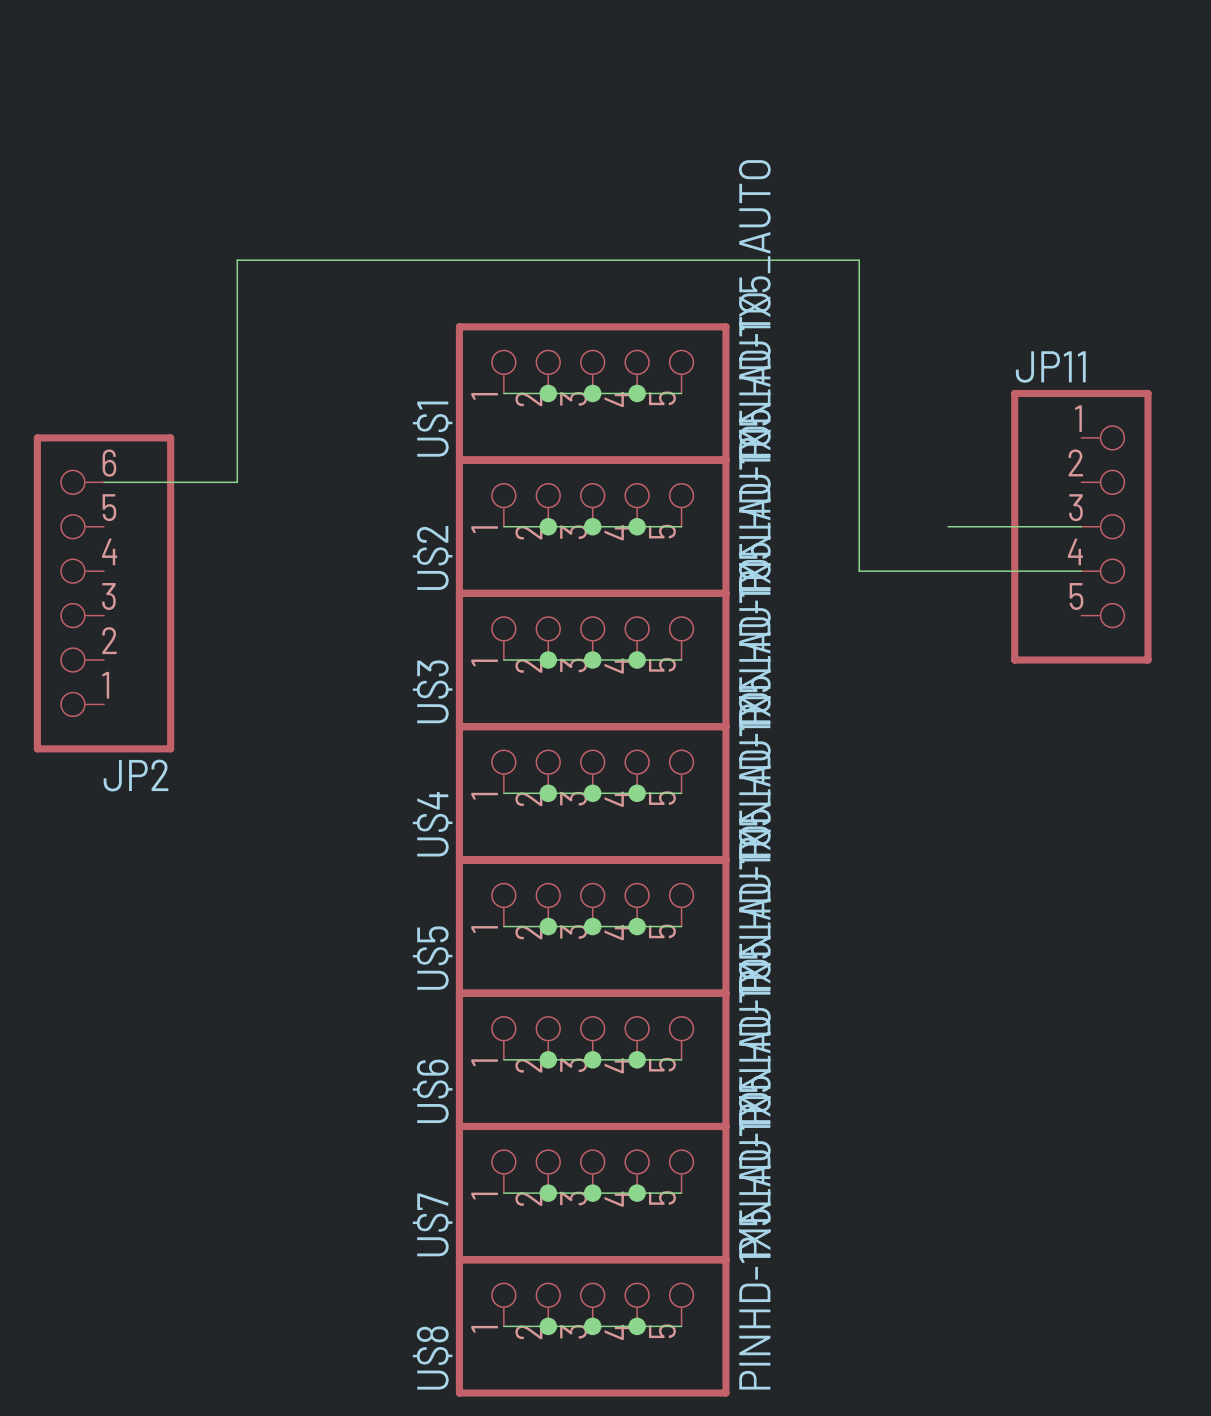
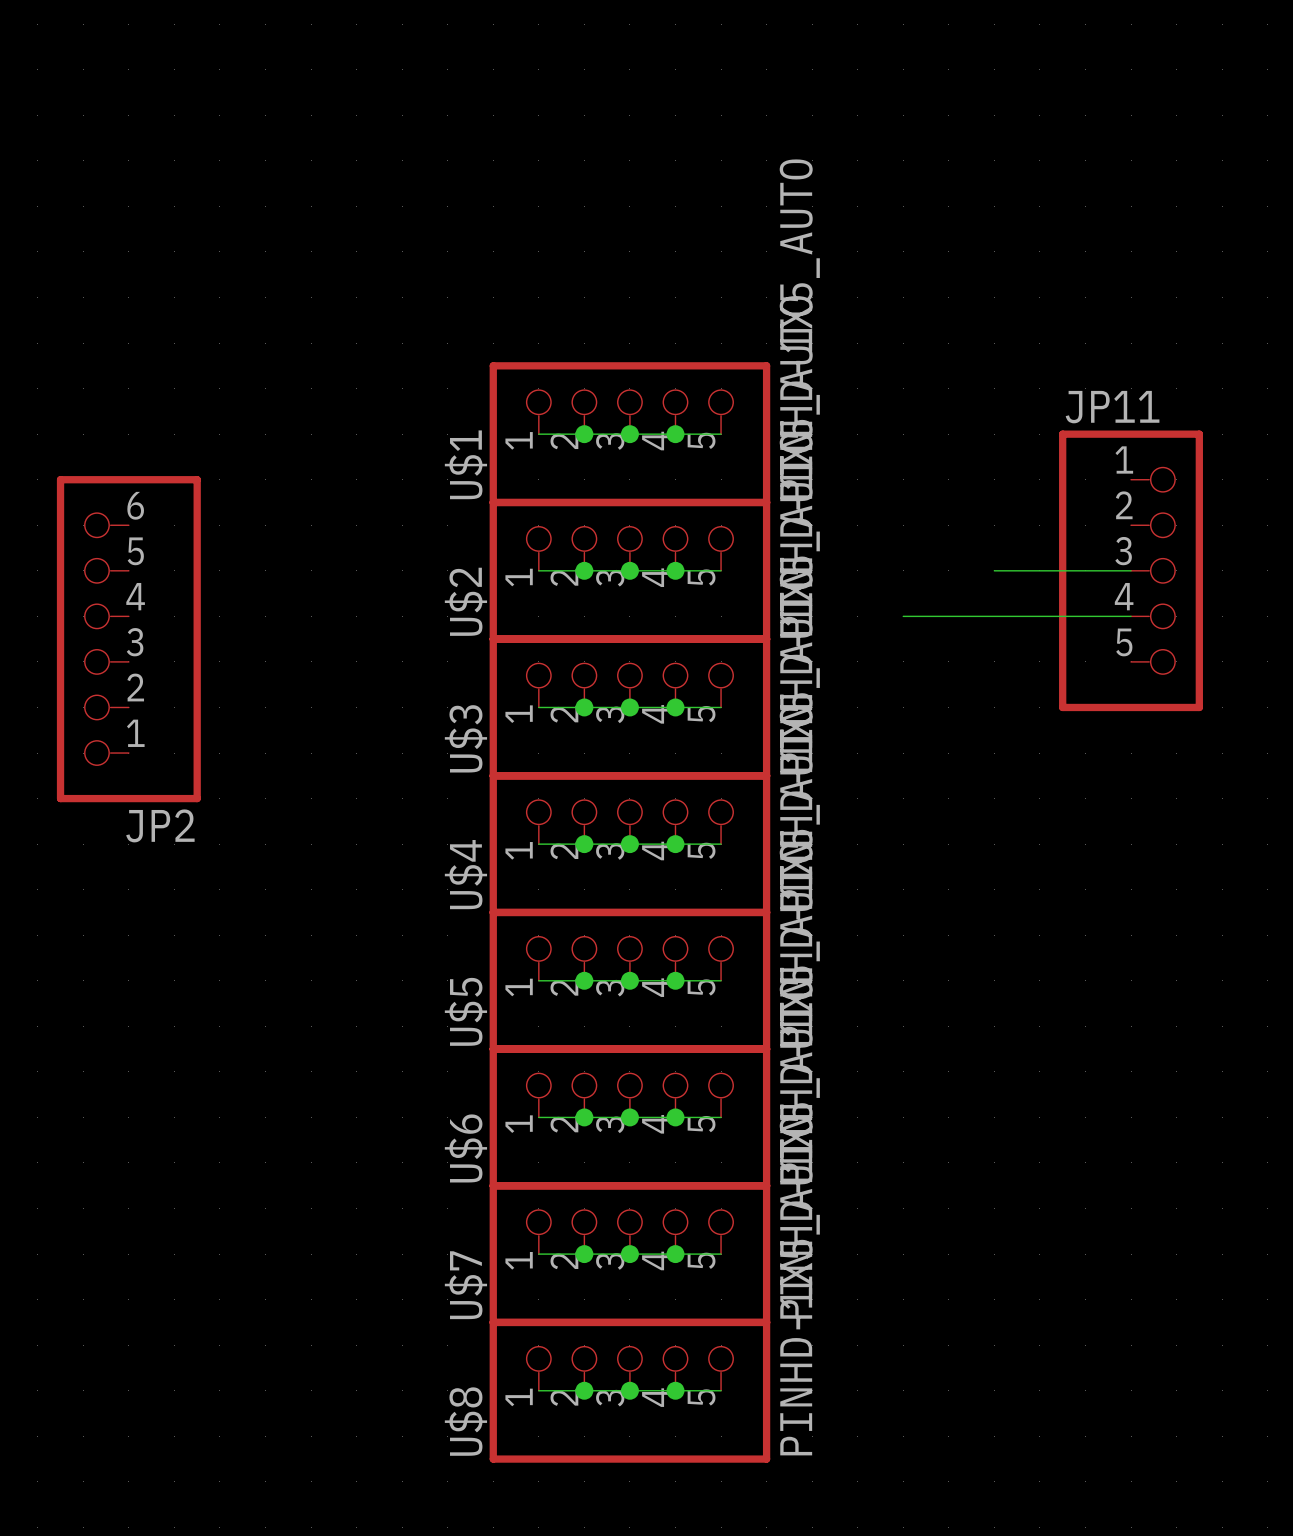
wire: (104, 482) (237, 482) (237, 260) (859, 260) (859, 571) -> none

